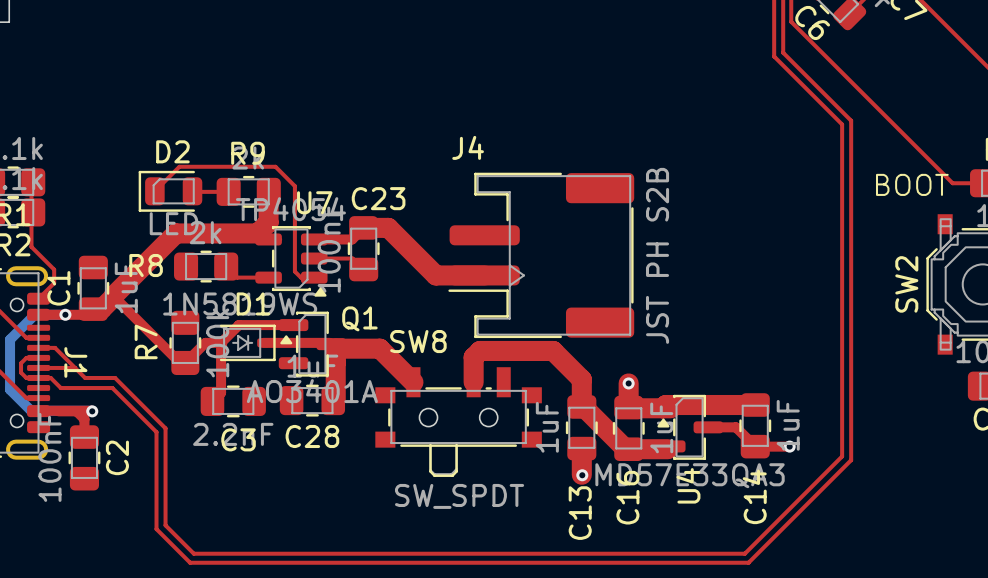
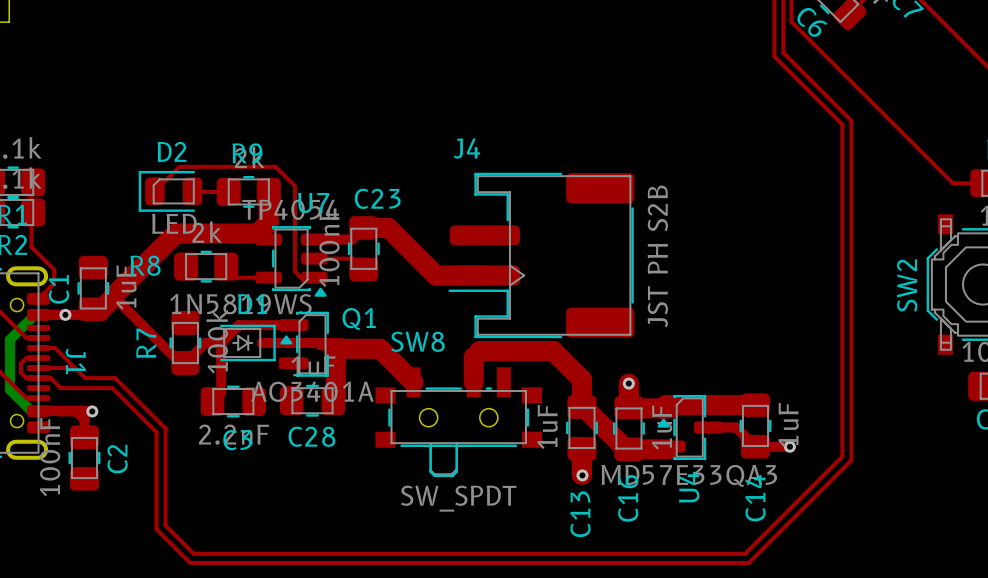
text: BOOT (912, 184) -> none

